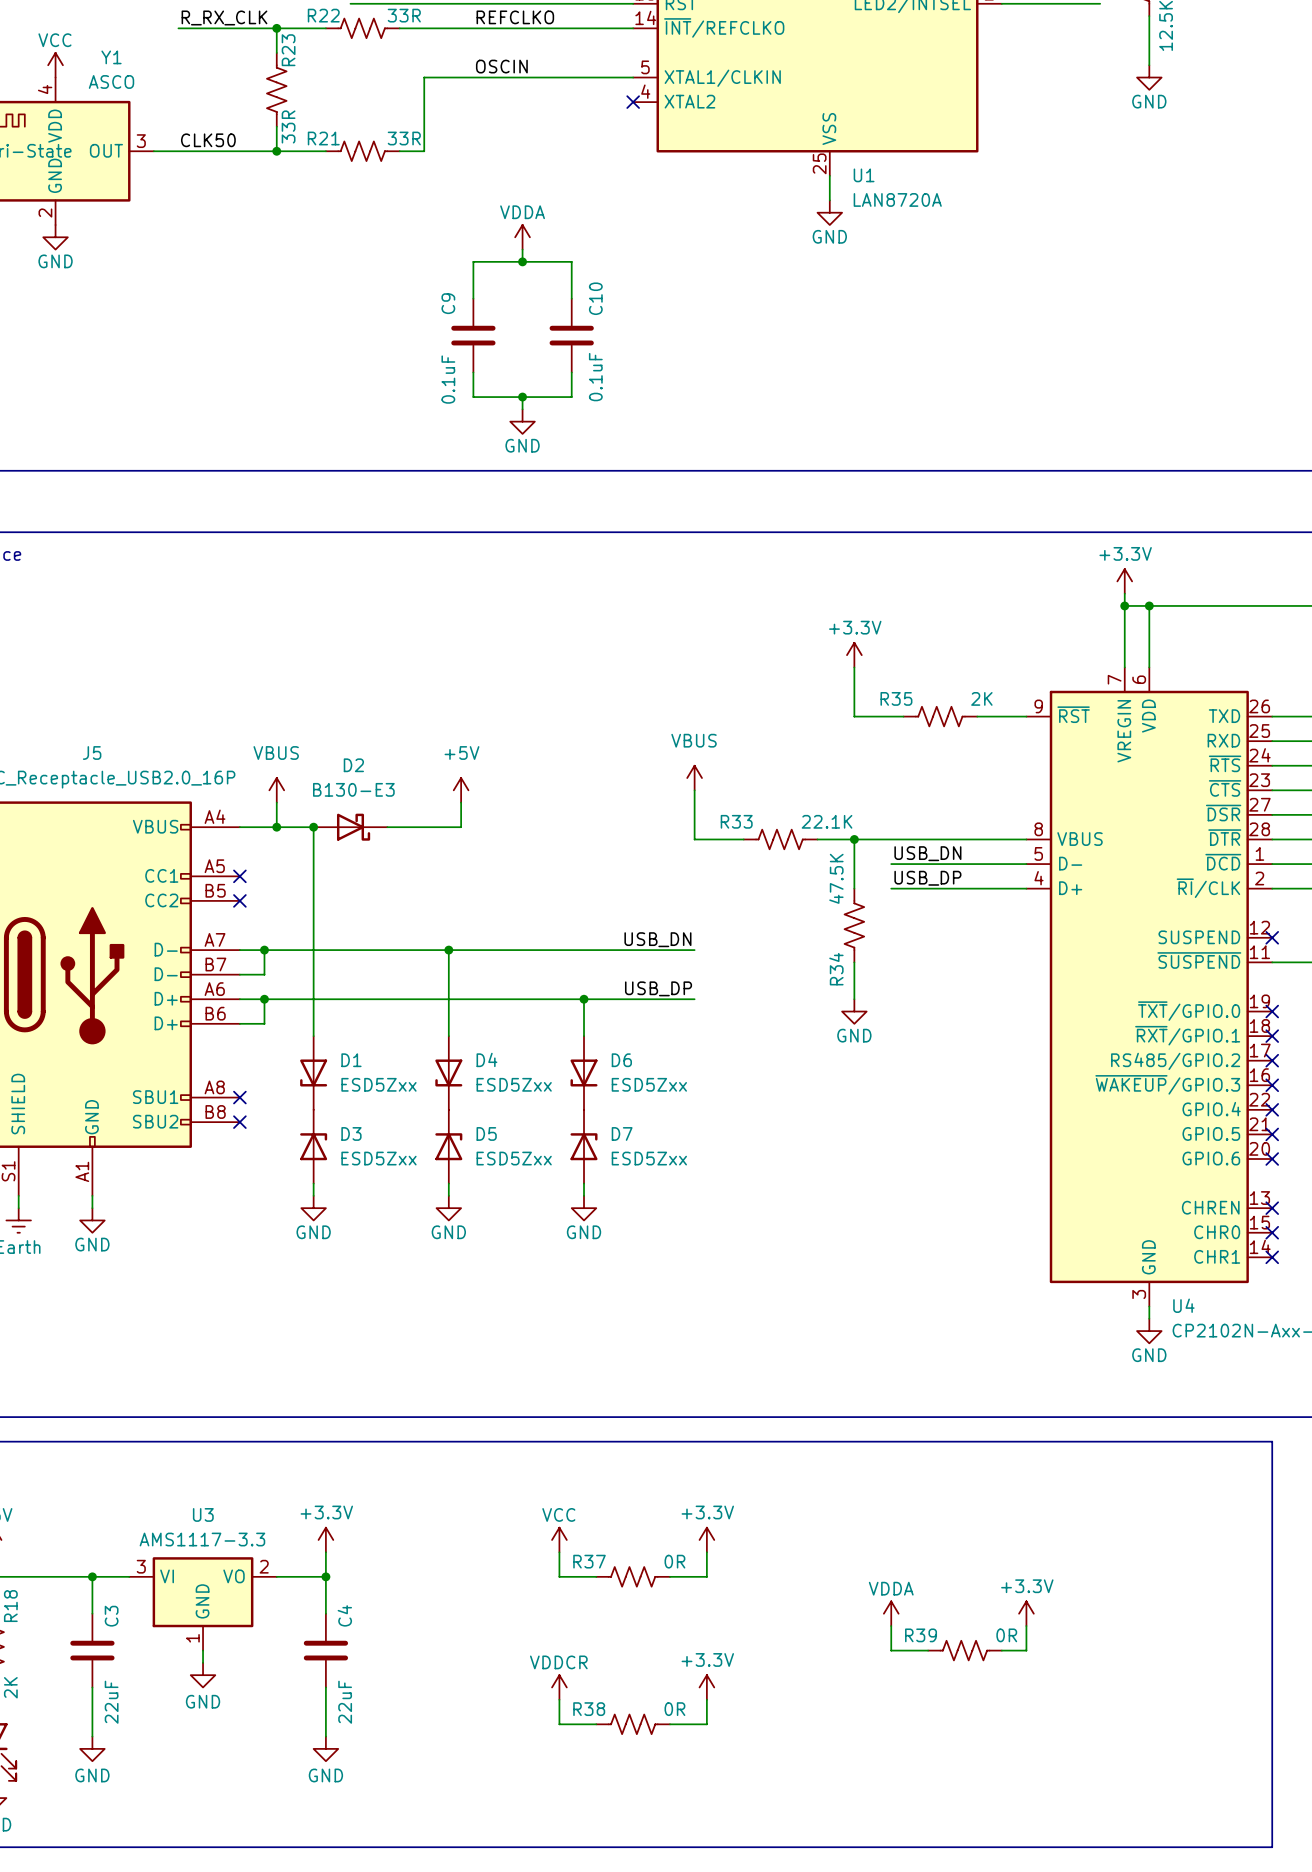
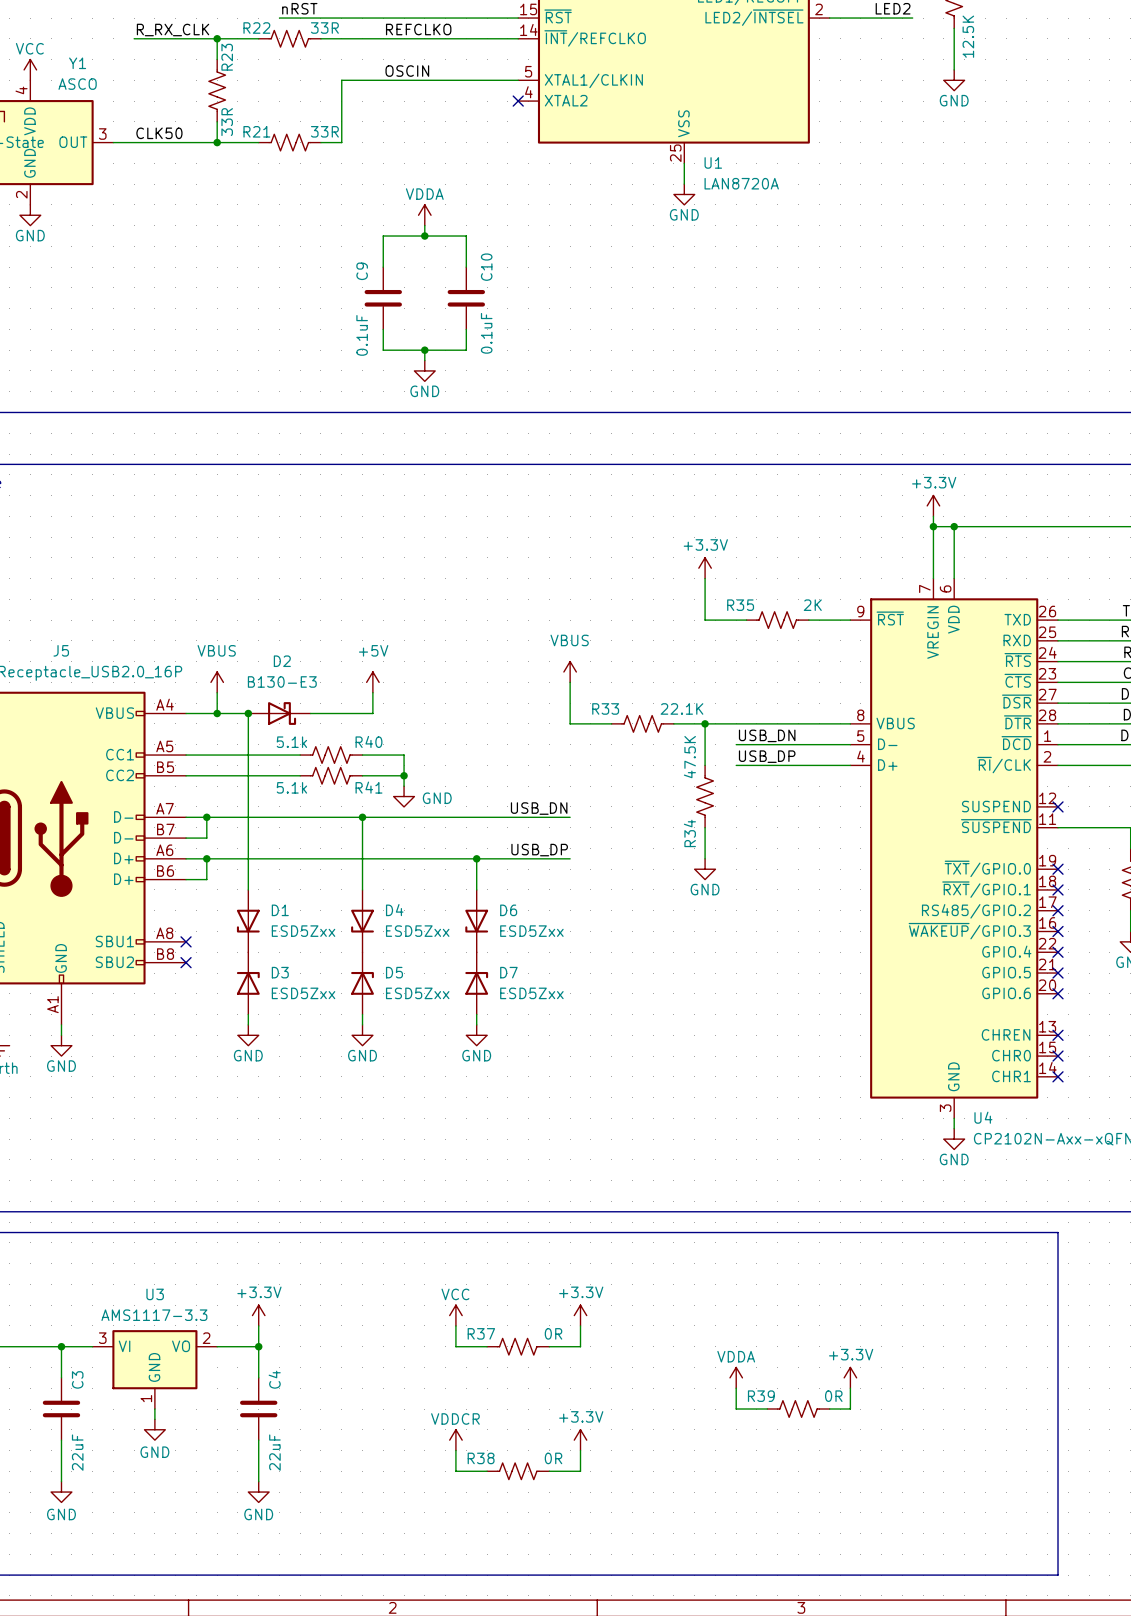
wire: none -> (186, 755) (300, 755)
no-connect mark: (239, 876) -> none
R40: none -> 5.1k (331, 755)
wire: none -> (362, 755) (404, 755) (404, 786)
wire: none -> (186, 775) (300, 775)
no-connect mark: (239, 900) -> none
R41: none -> 5.1k (331, 775)
wire: none -> (362, 775) (404, 775)
junction: none -> (404, 775)
power symbol: none -> GND (404, 796)

